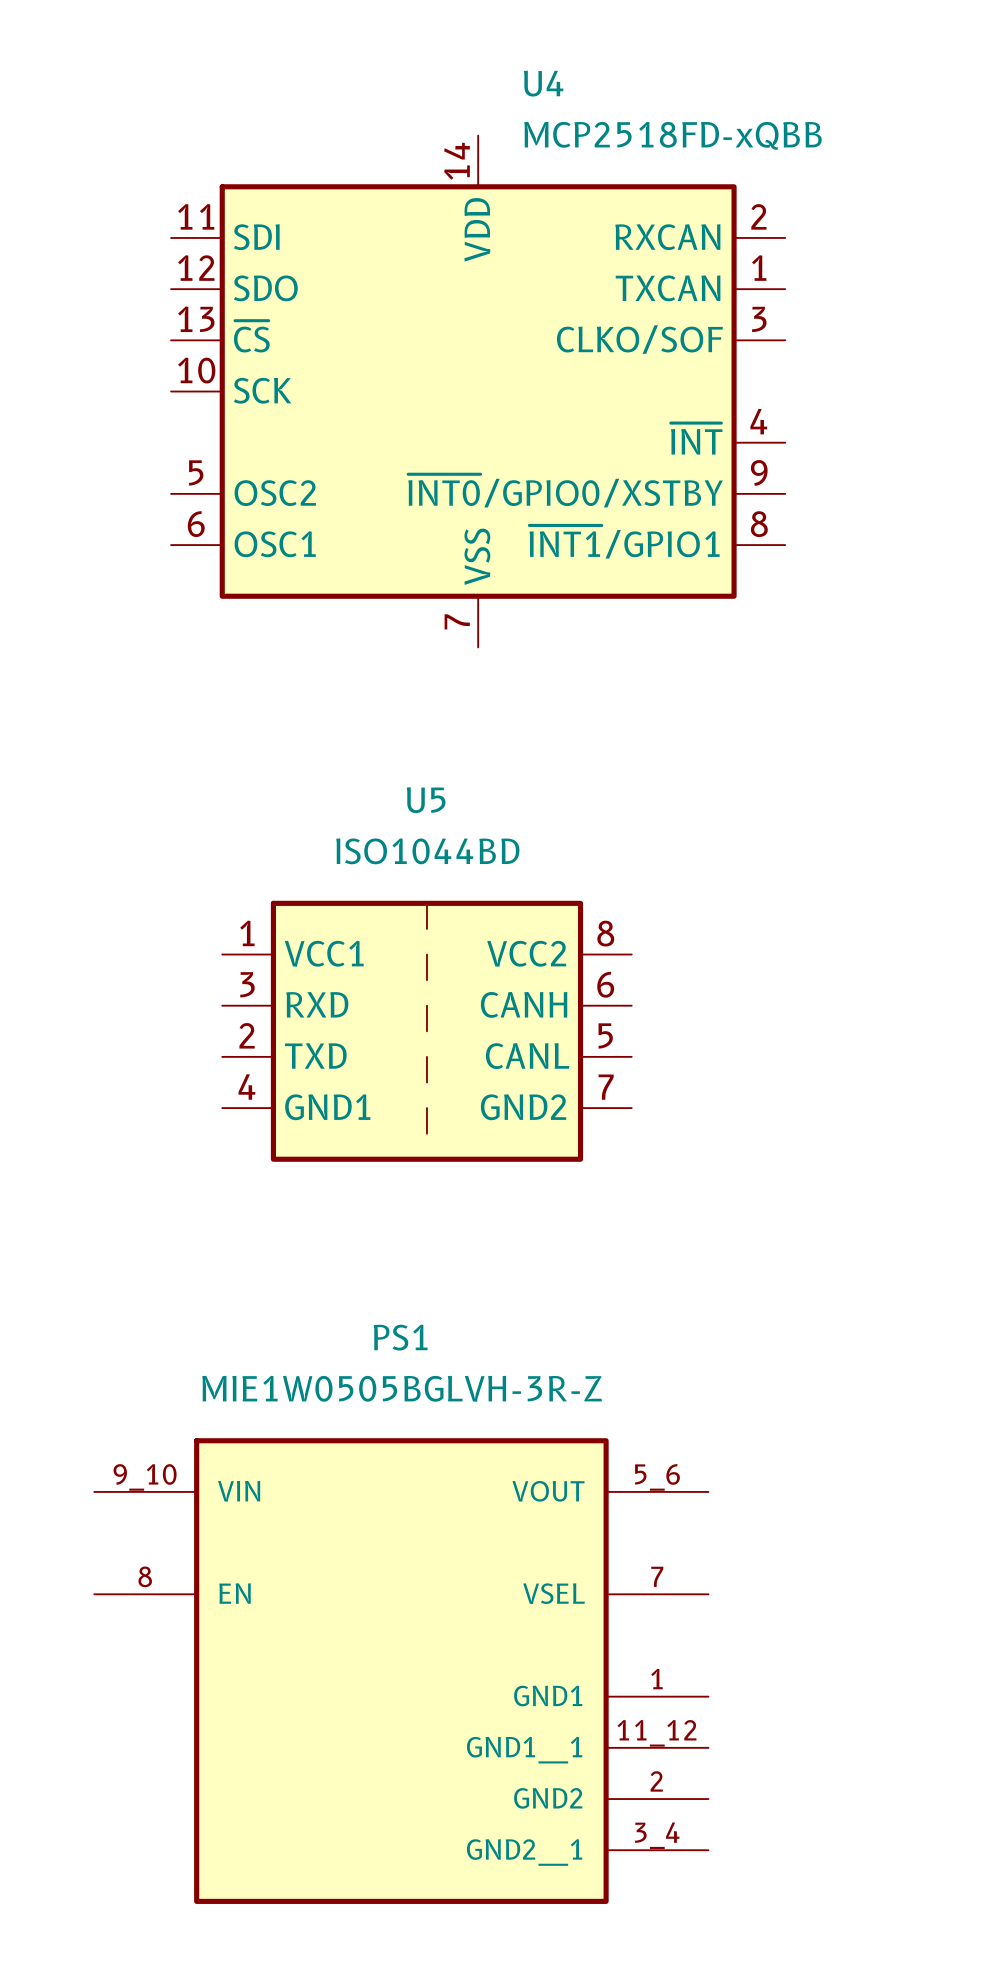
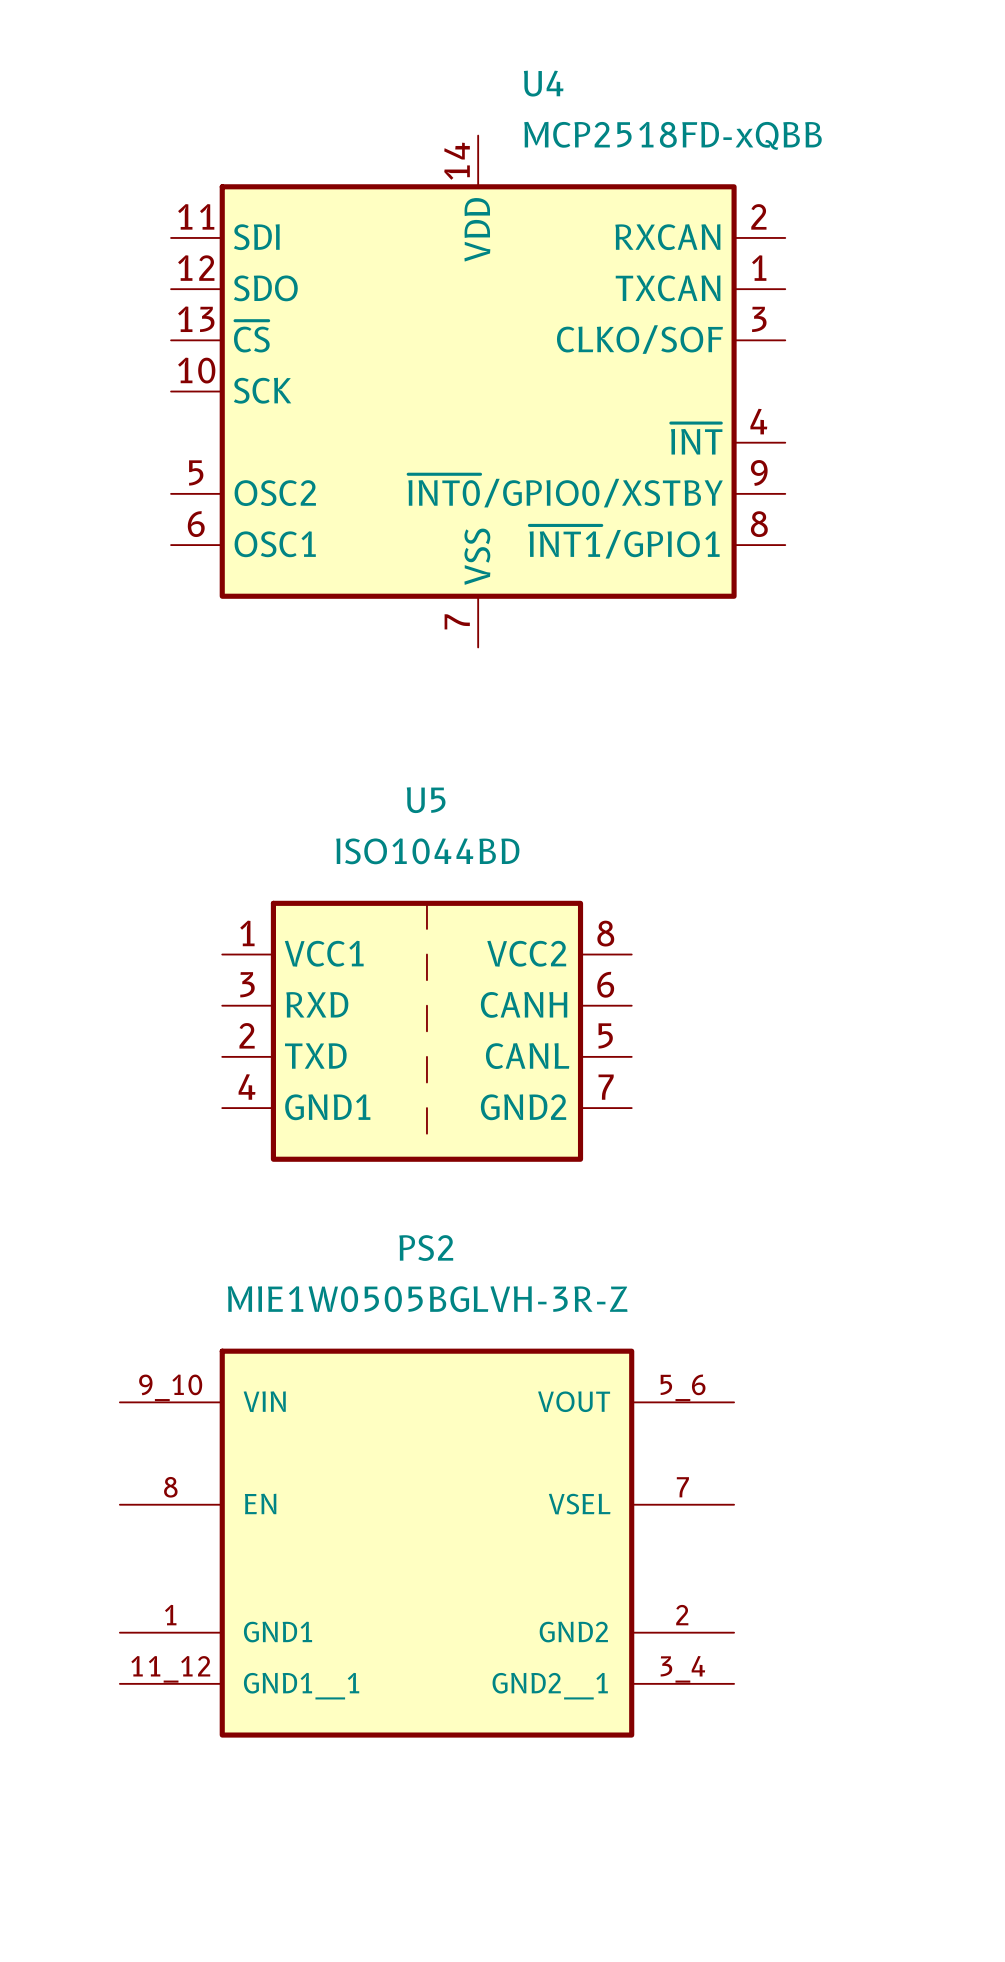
PS2: none -> MIE1W0505BGLVH-3R-Z (426, 1543)
PS1: MIE1W0505BGLVH-3R-Z (401, 1671) -> none

